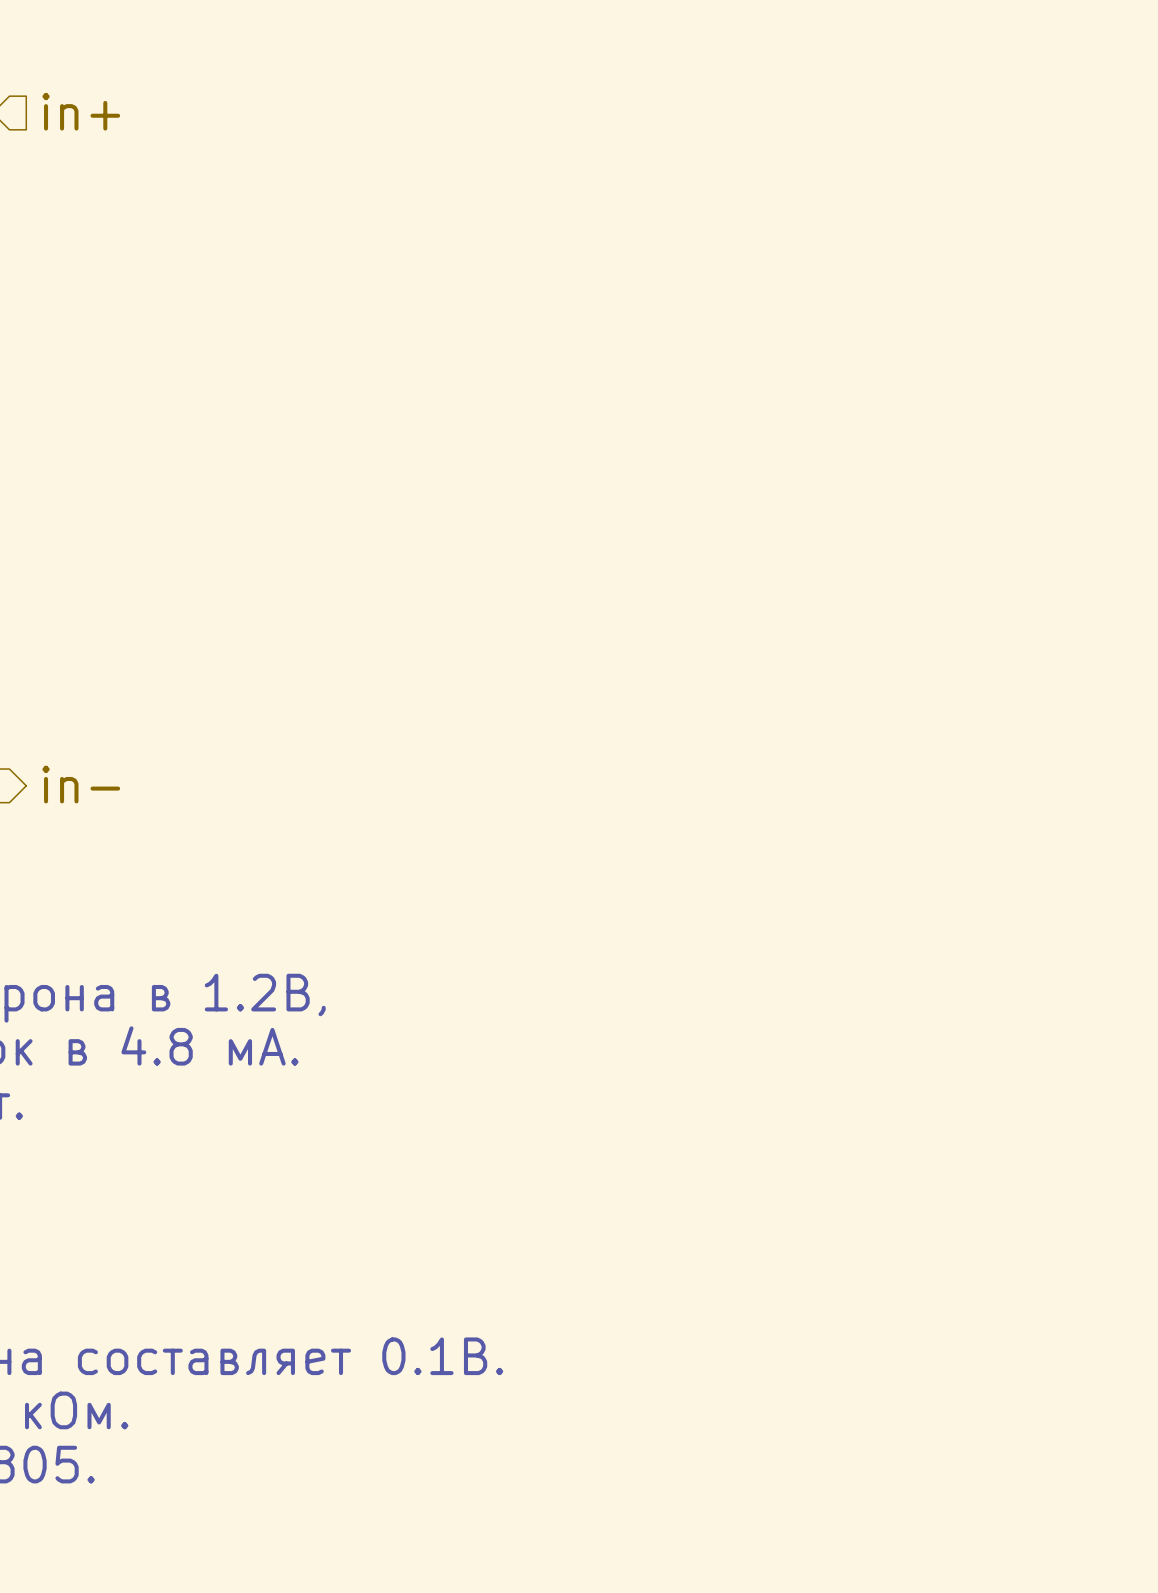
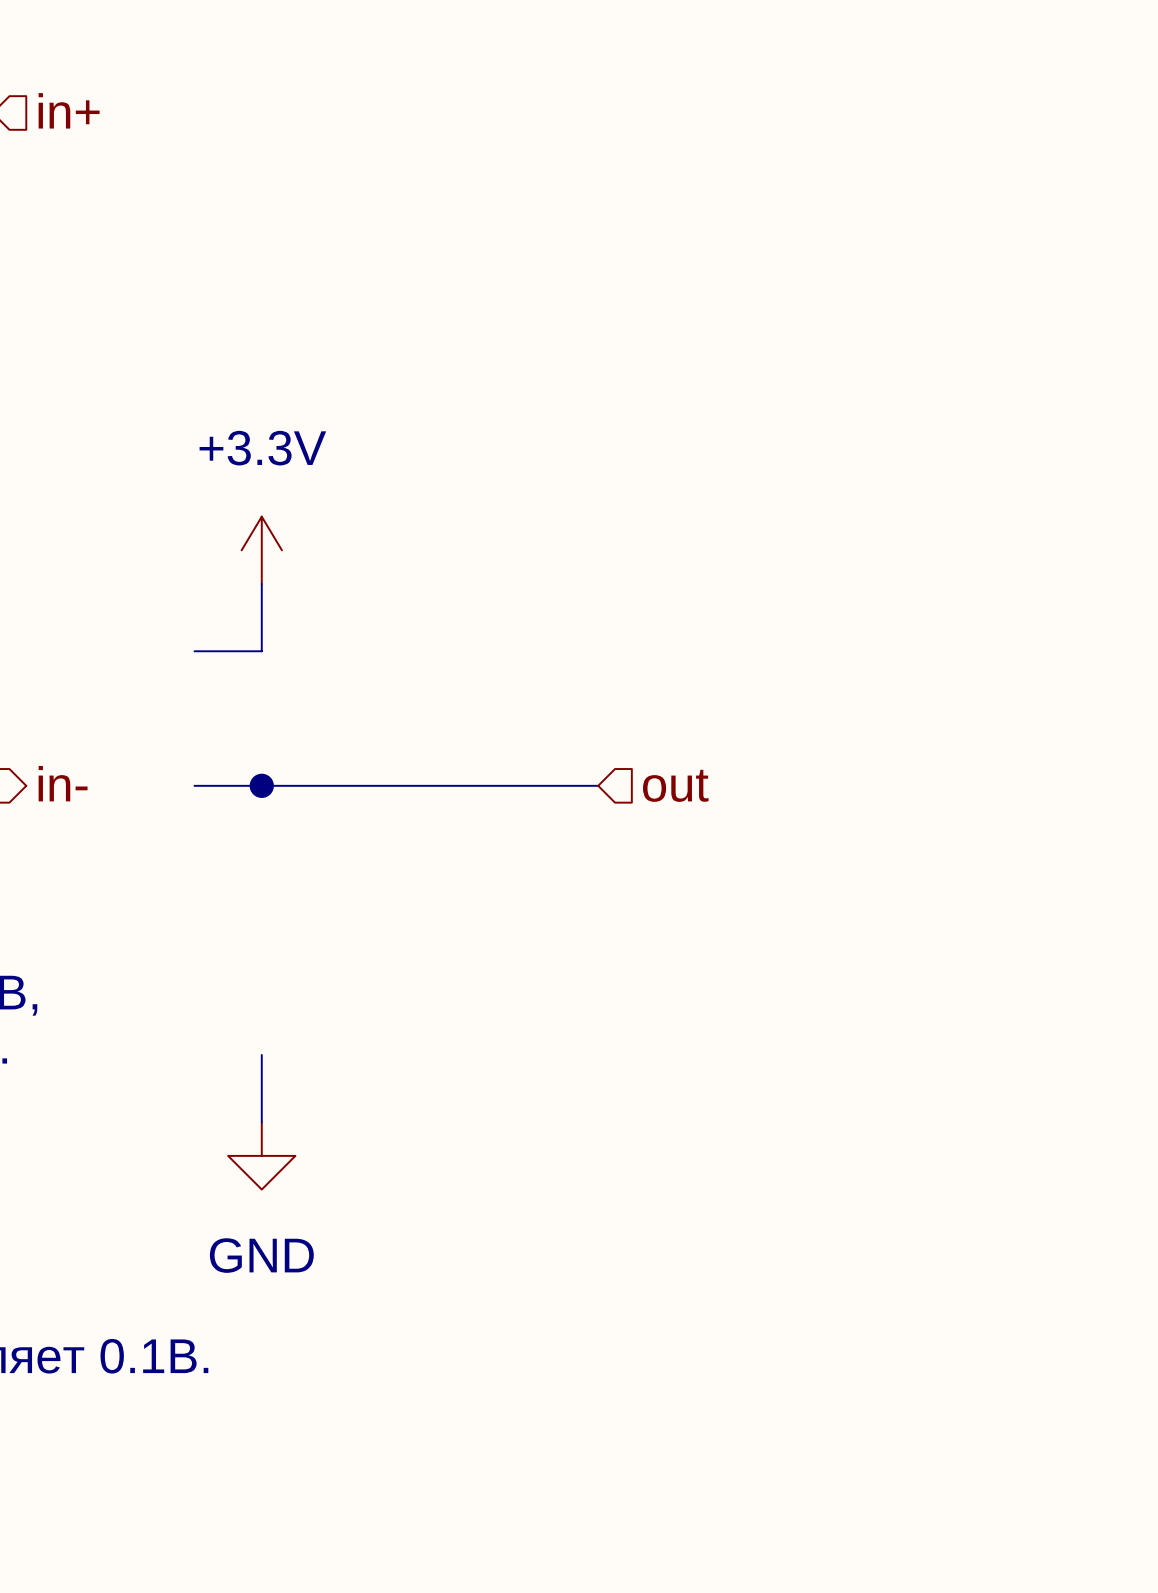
power symbol: none -> +3.3V (261, 550)
wire: none -> (261, 583) (261, 651) (194, 651)
hierarchical label: none -> out (675, 785)
wire: none -> (194, 785) (598, 785)
junction: none -> (261, 785)
wire: none -> (261, 1054) (261, 1122)
power symbol: none -> GND (261, 1155)

